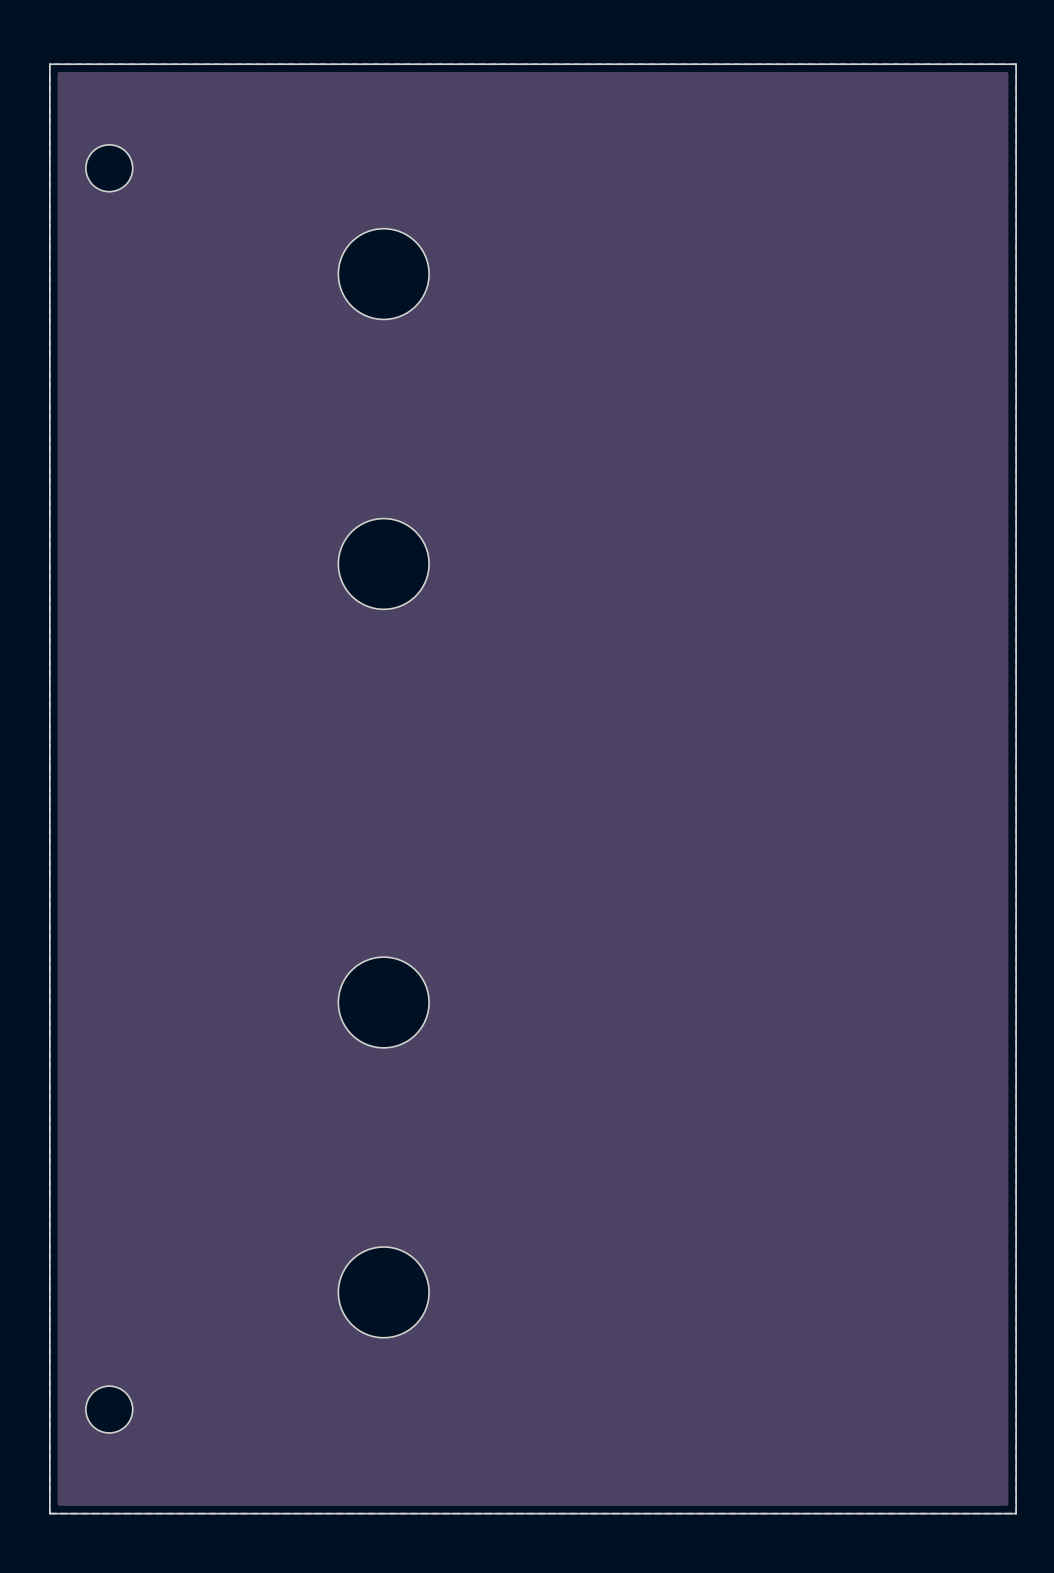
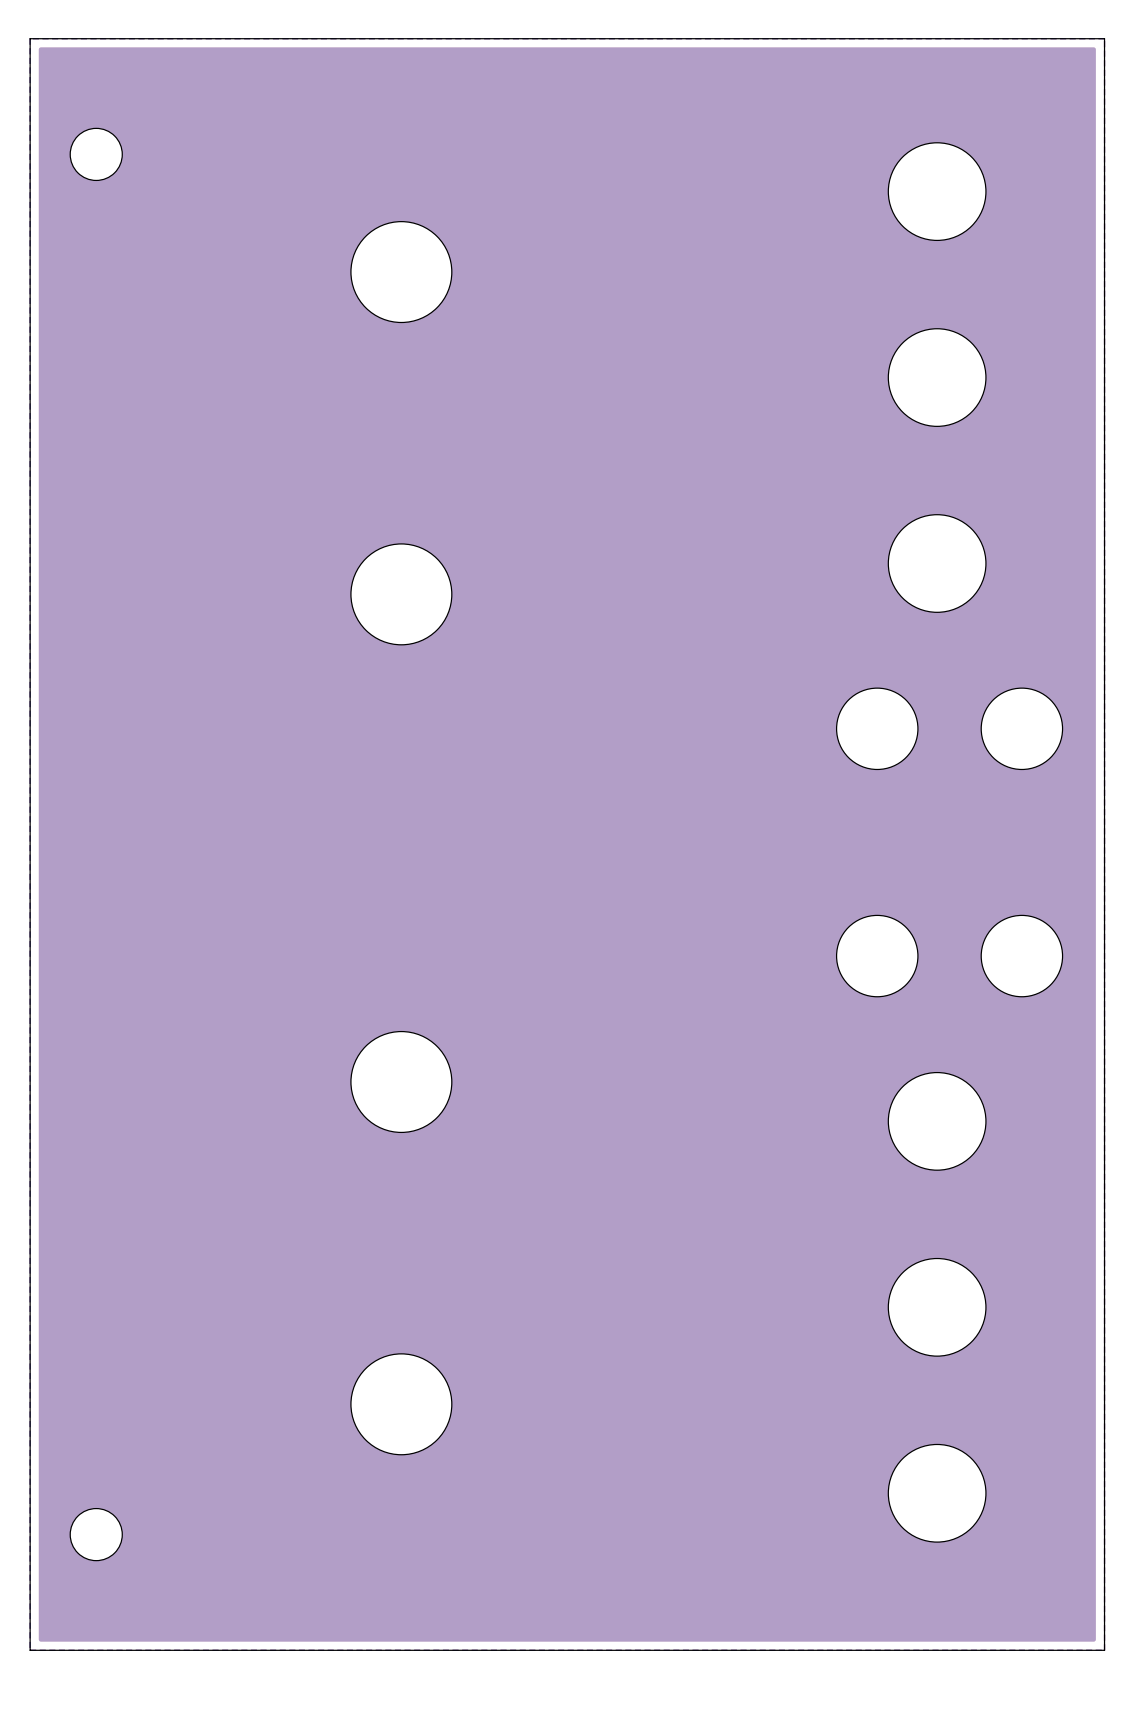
part: none -> (937, 191)
part: none -> (937, 377)
part: none -> (937, 563)
part: none -> (877, 728)
part: none -> (1021, 728)
part: none -> (877, 956)
part: none -> (1021, 956)
part: none -> (937, 1121)
part: none -> (937, 1307)
part: none -> (937, 1493)

